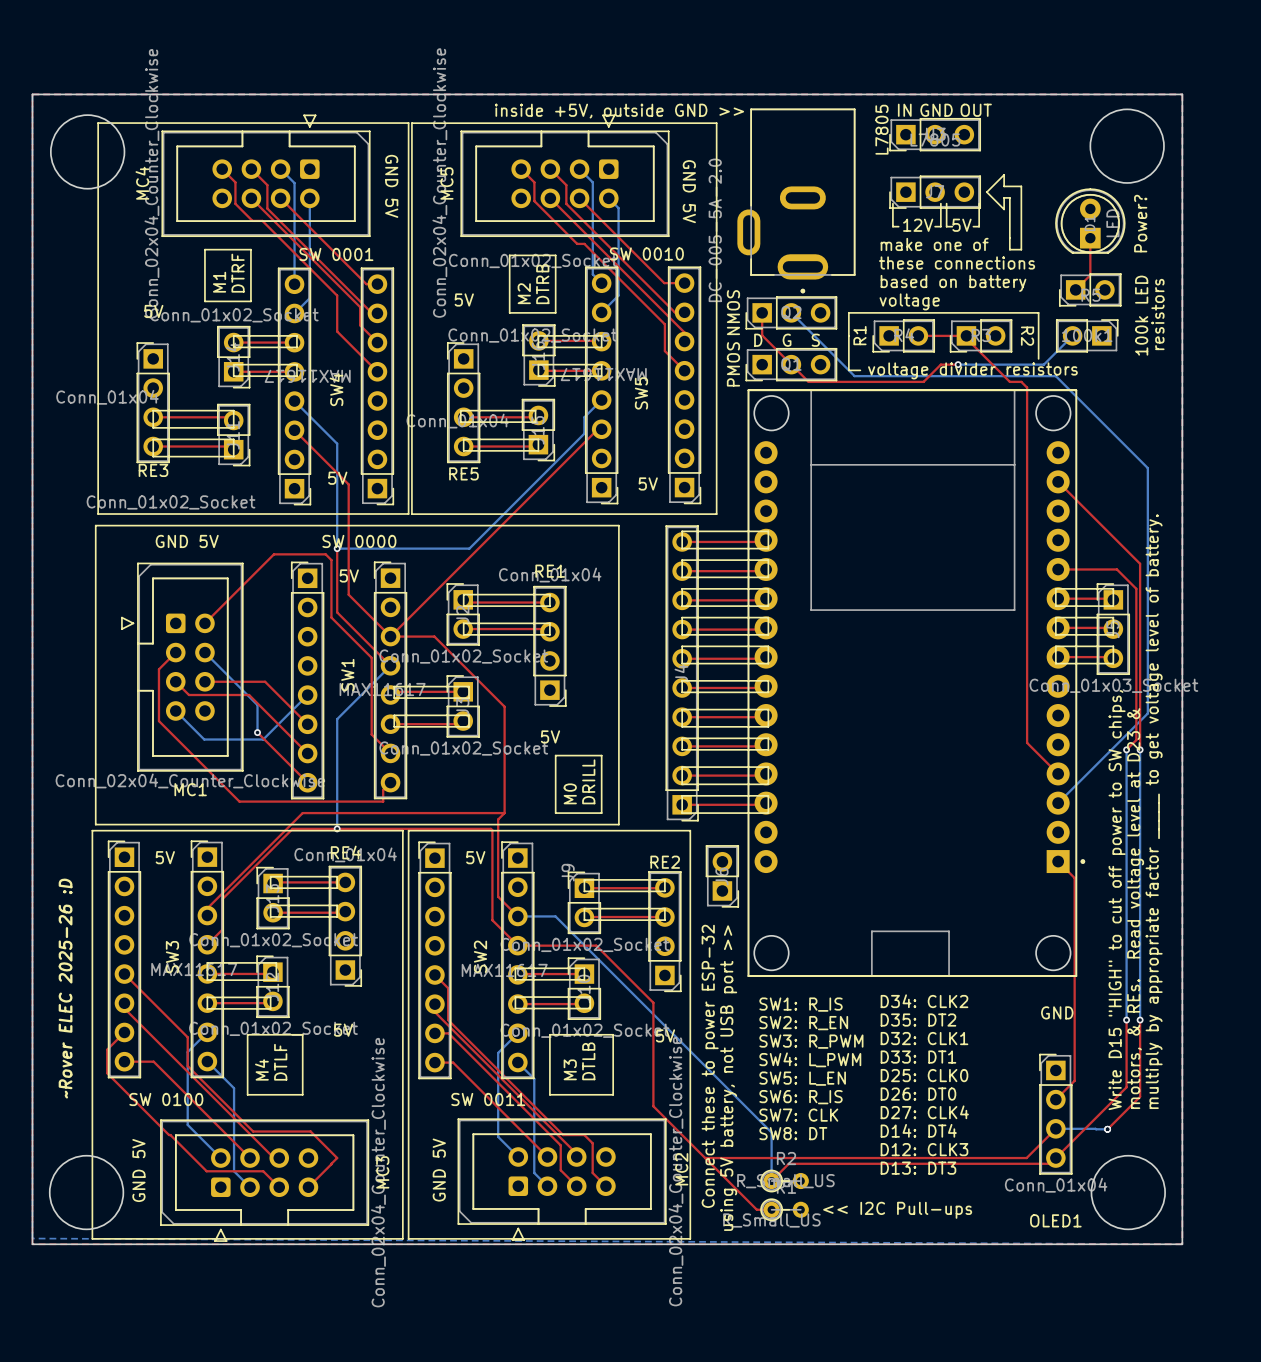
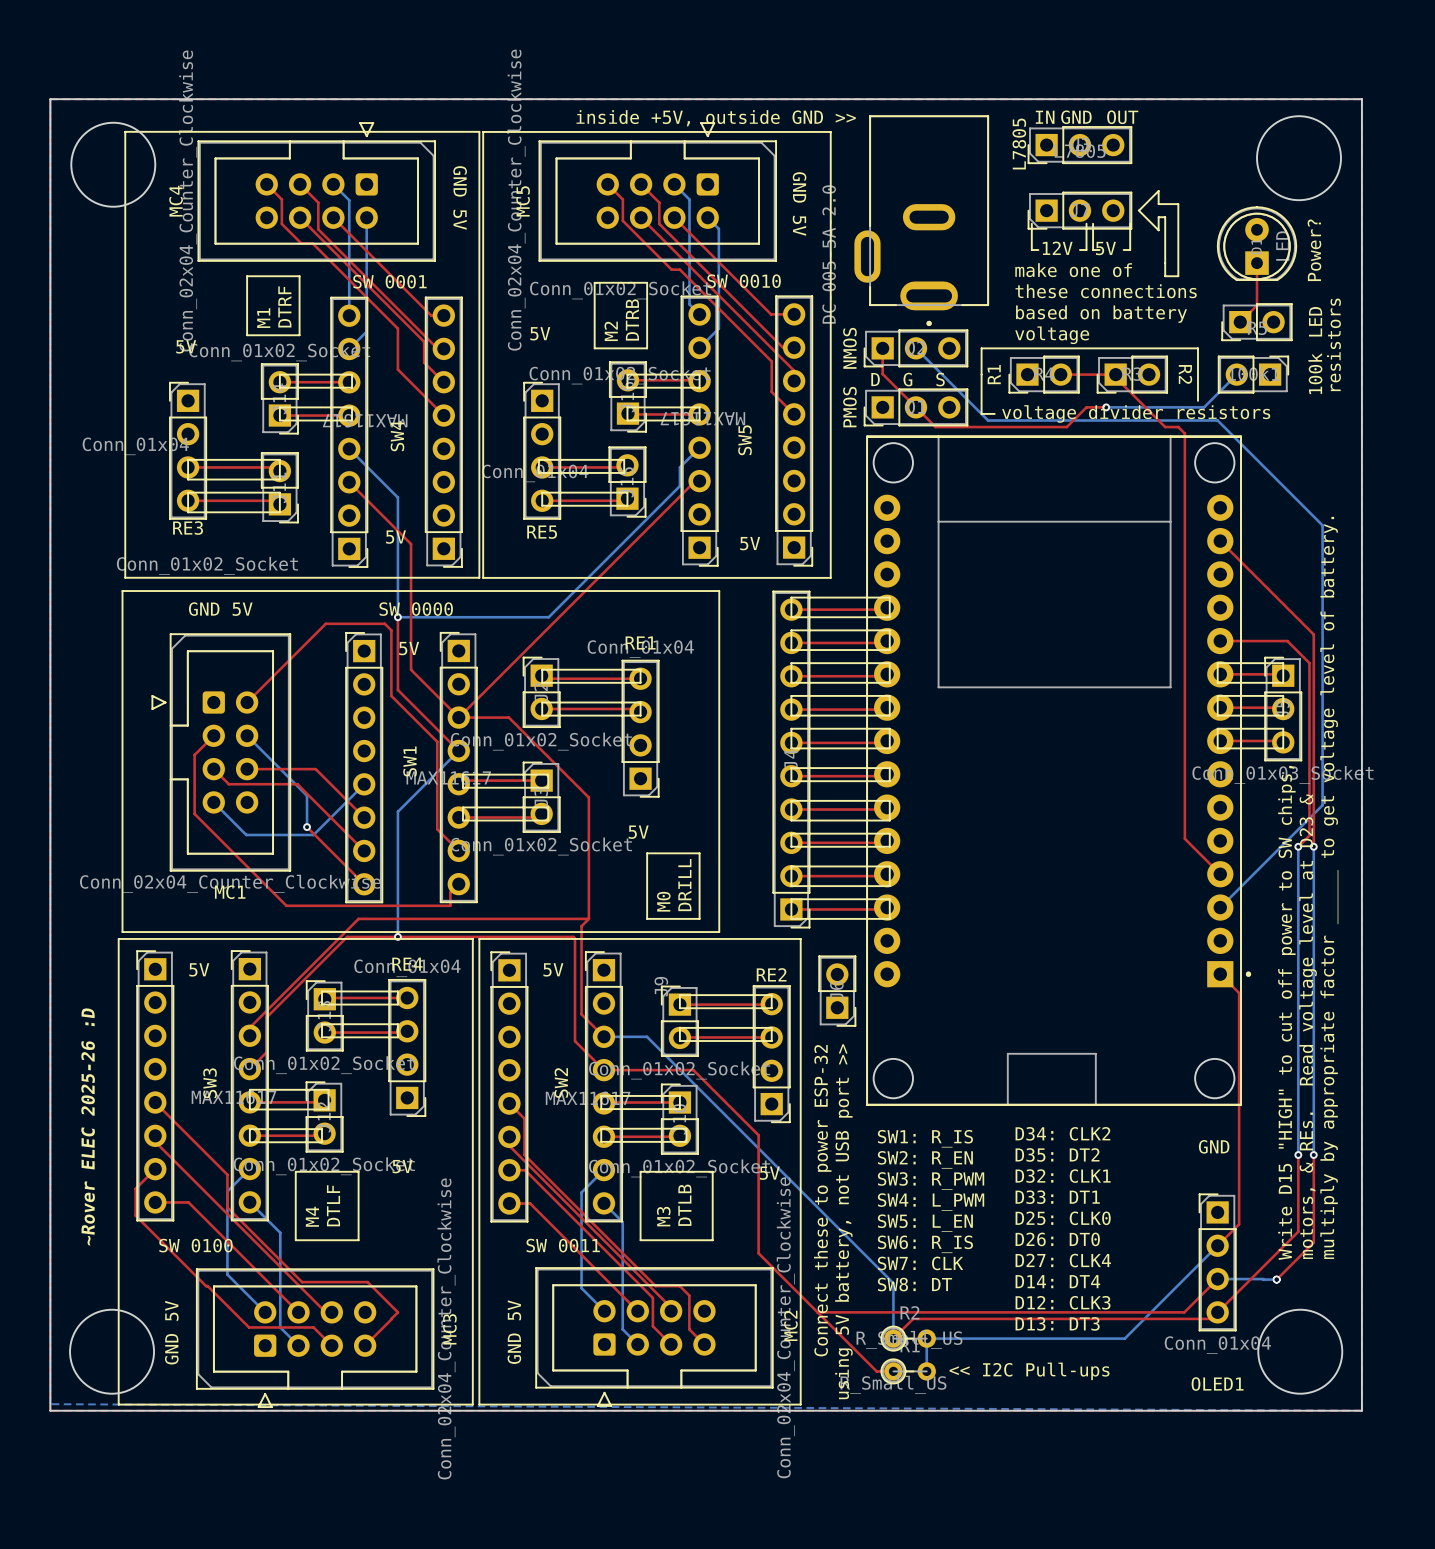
bottom track: none -> (1217, 1245) (1124, 1338) (926, 1338) (926, 1371)

